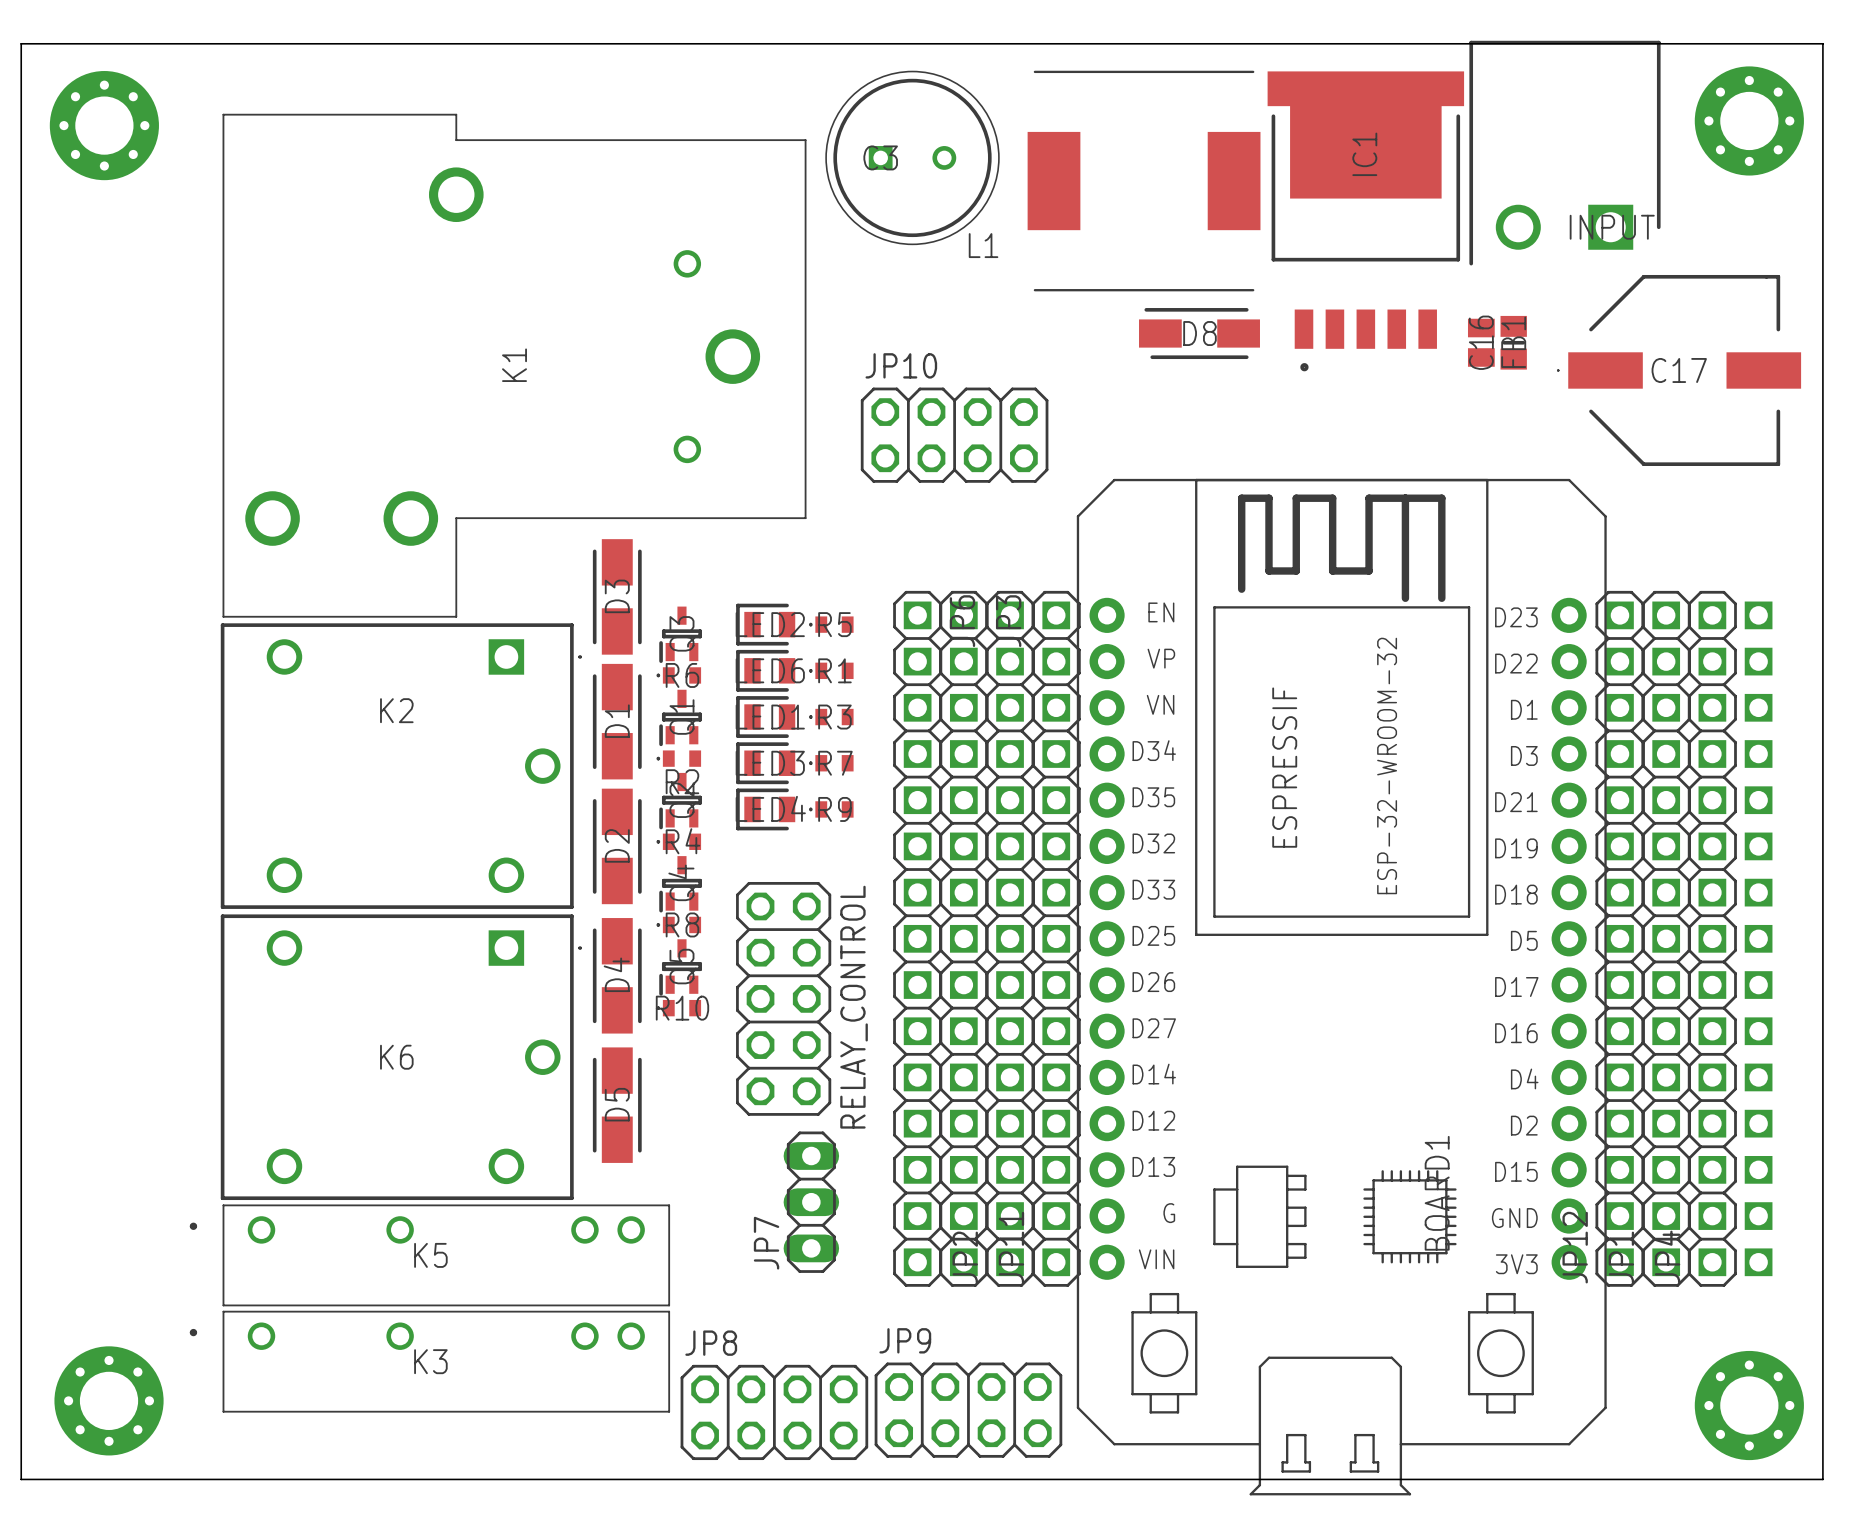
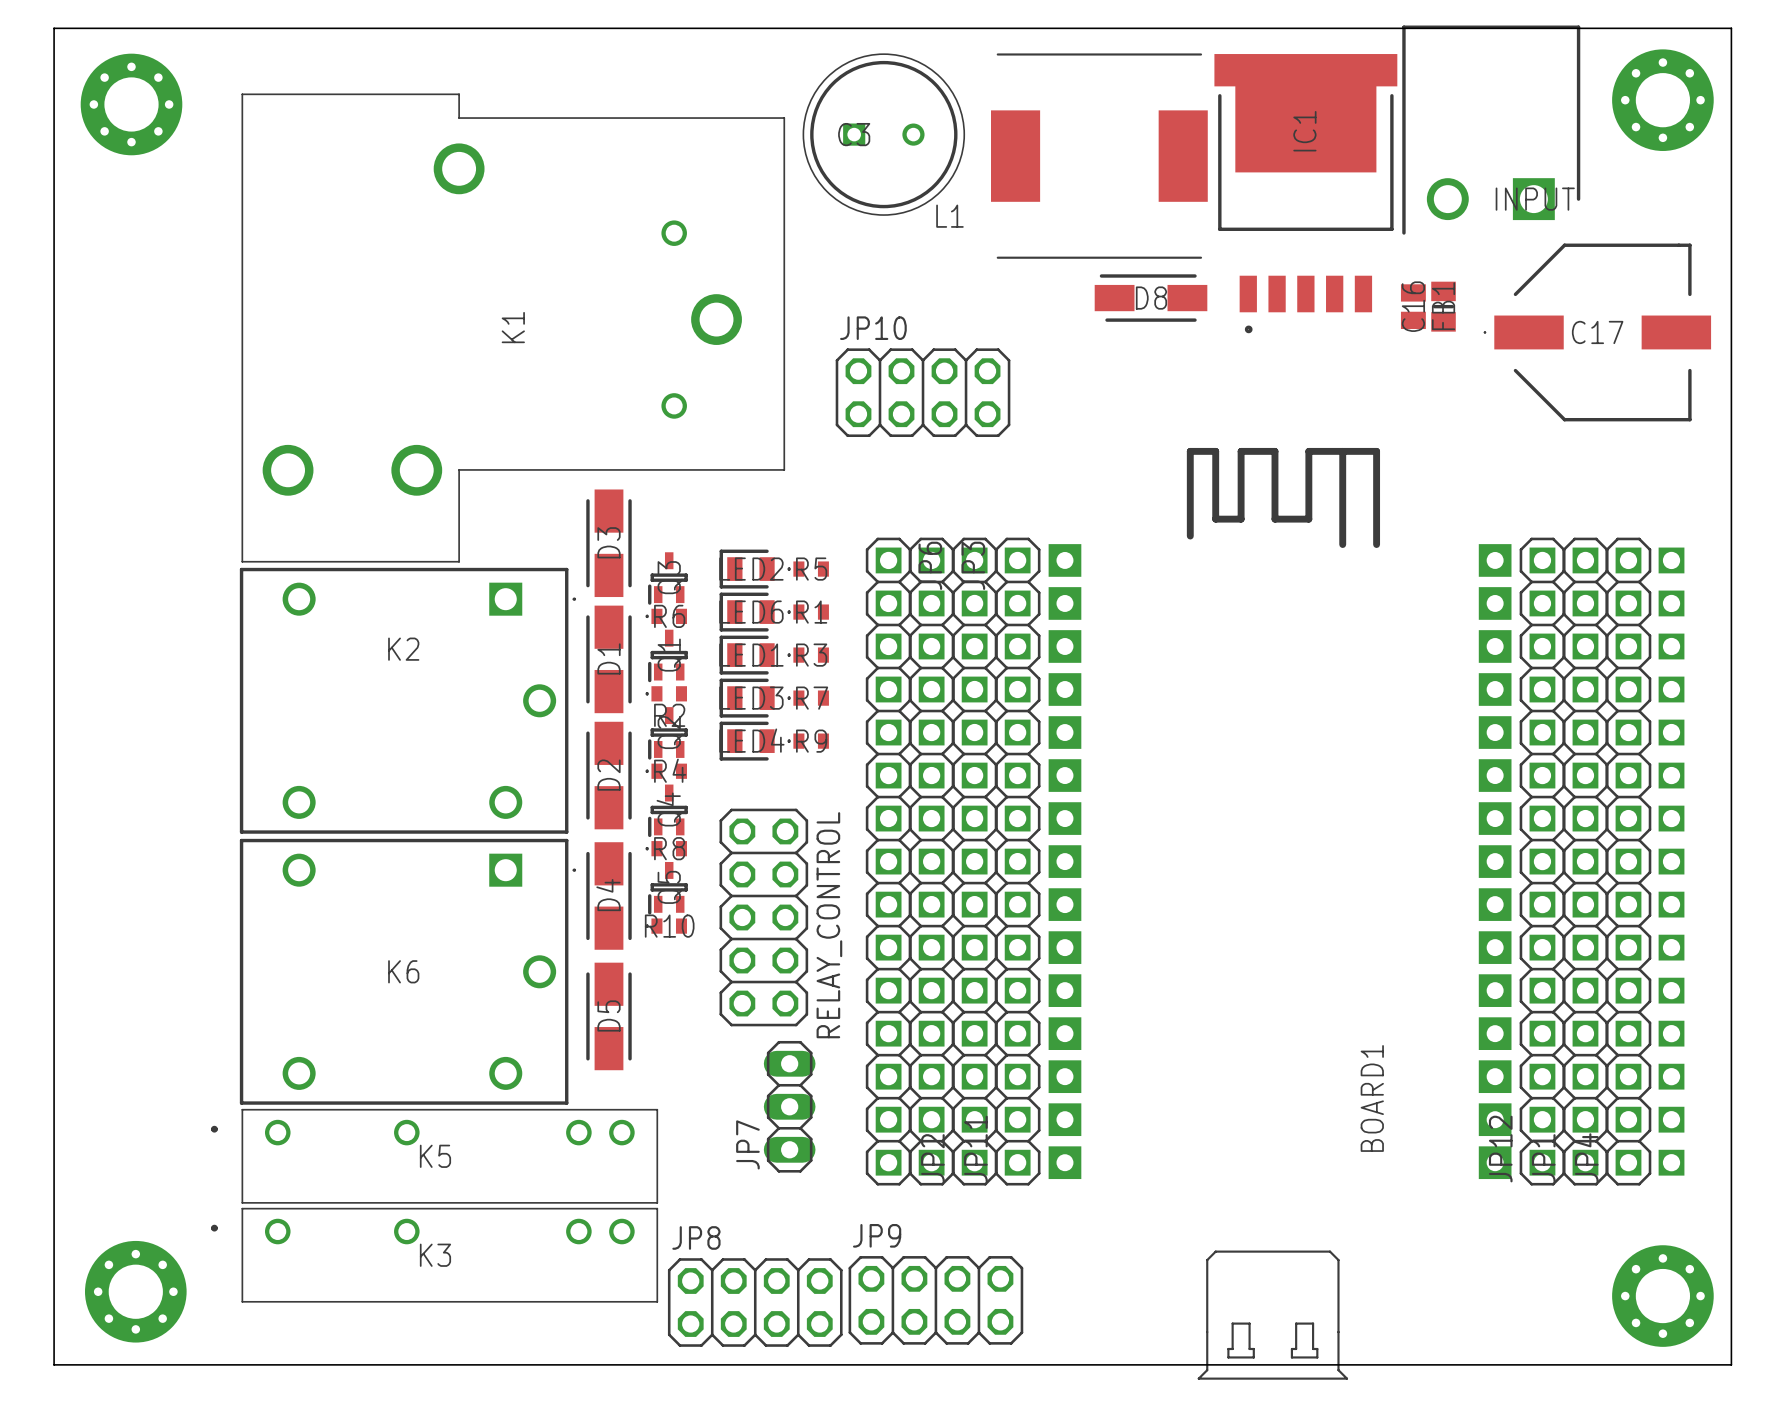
BOARD1 footprint: [1076, 478, 1607, 1496] -> [1048, 447, 1512, 1380]

